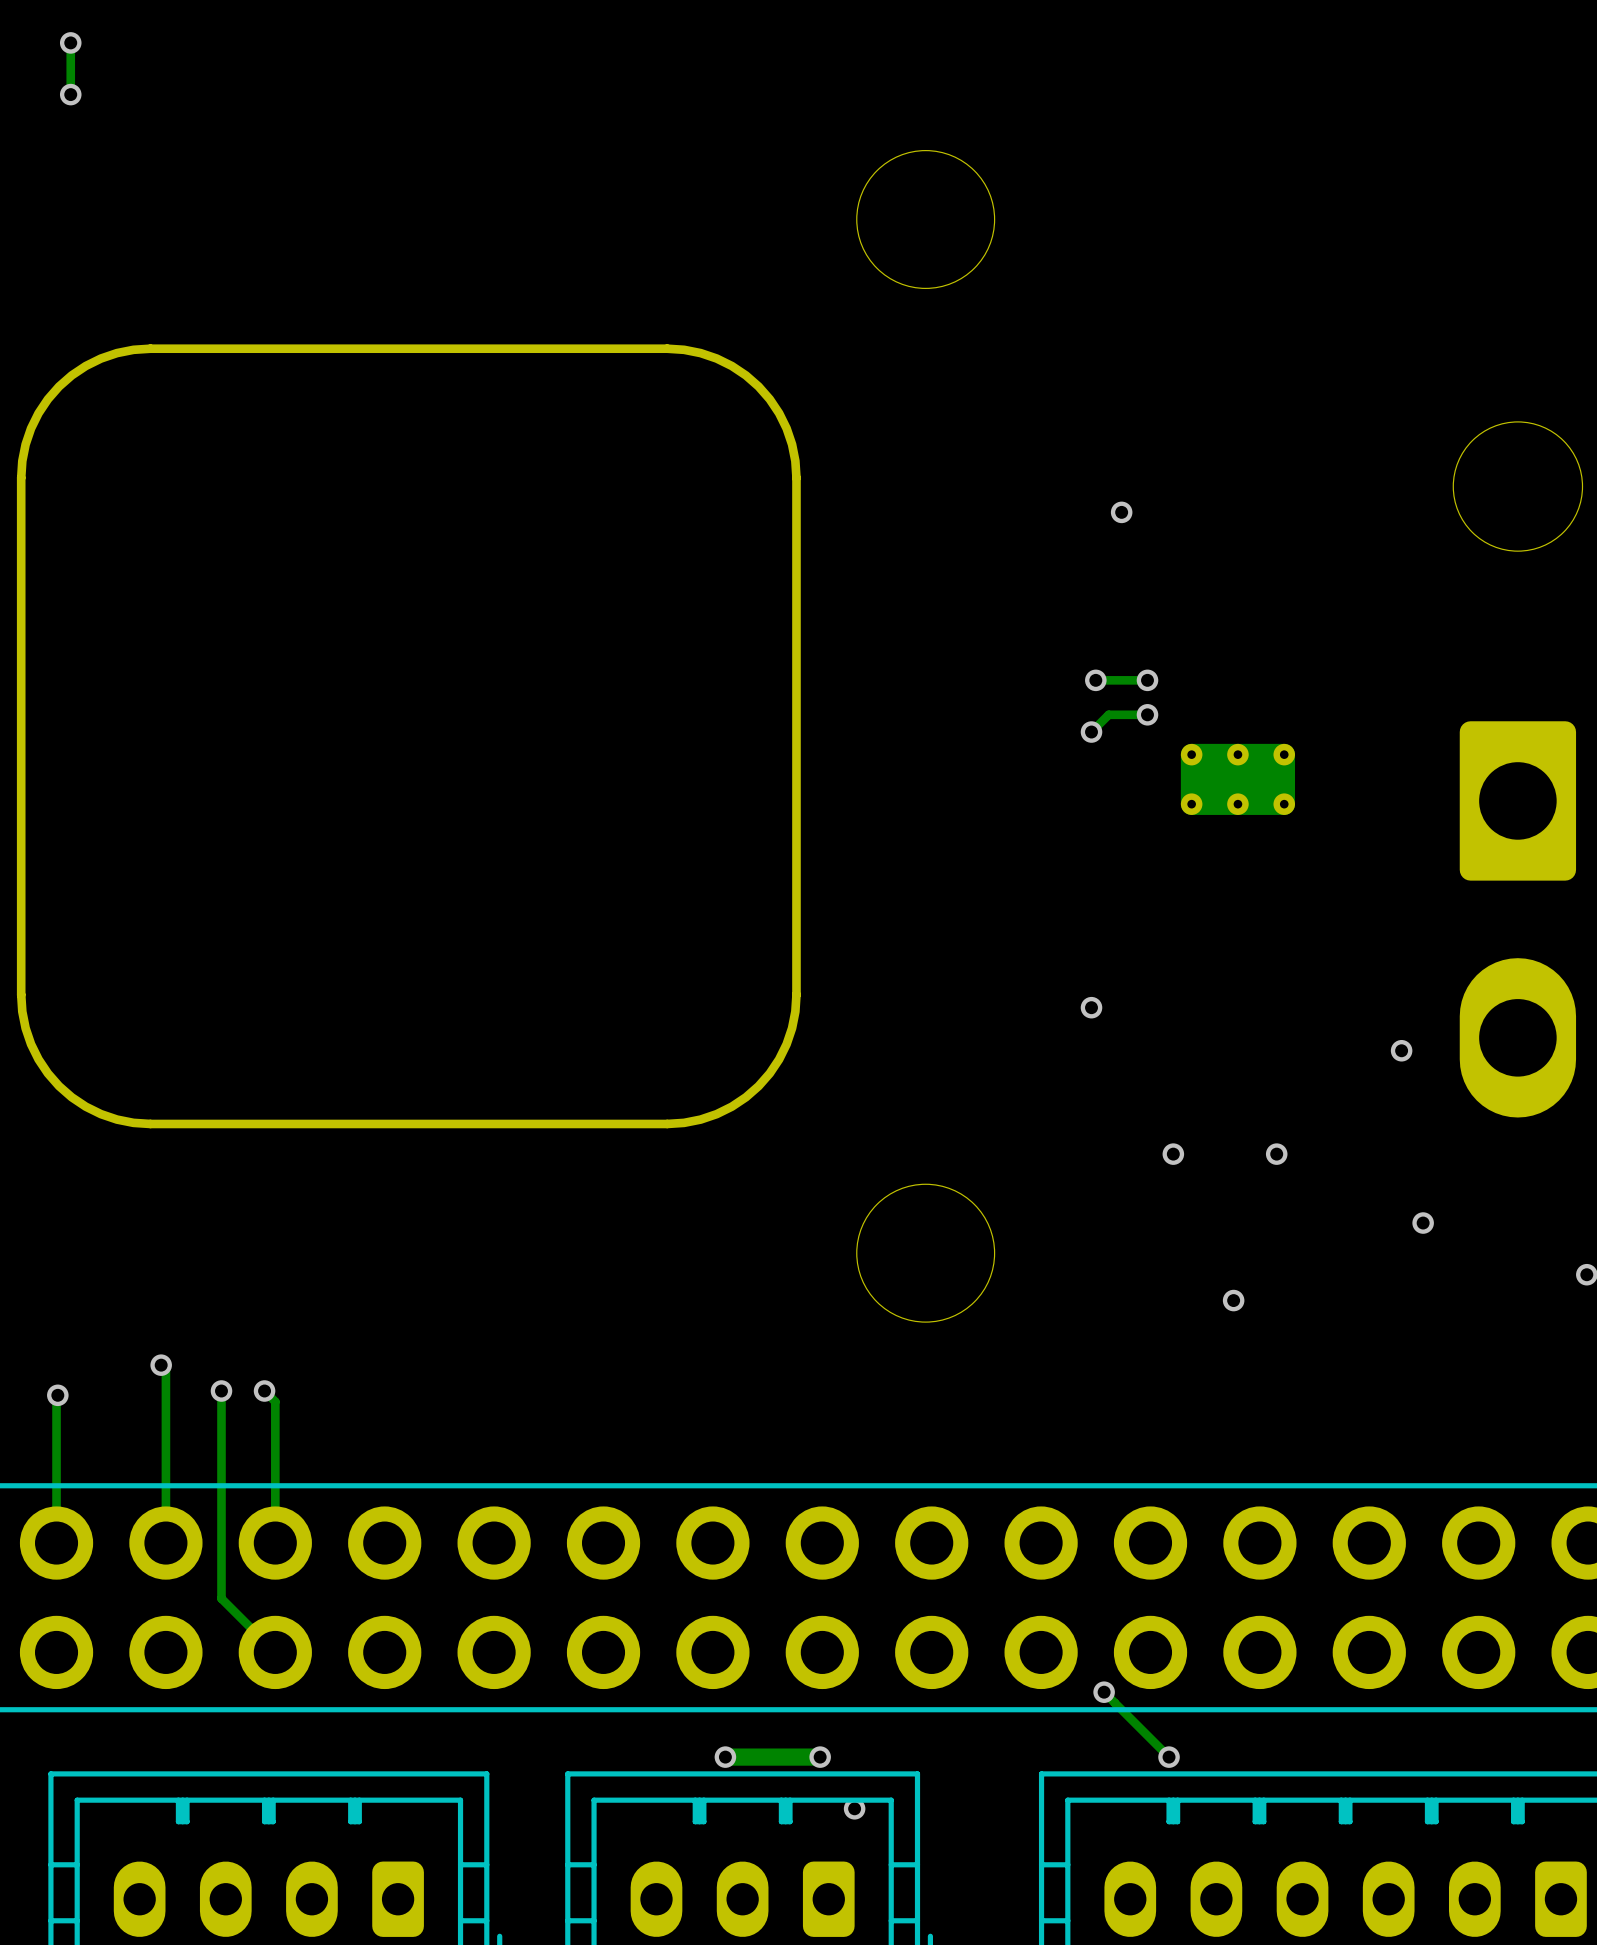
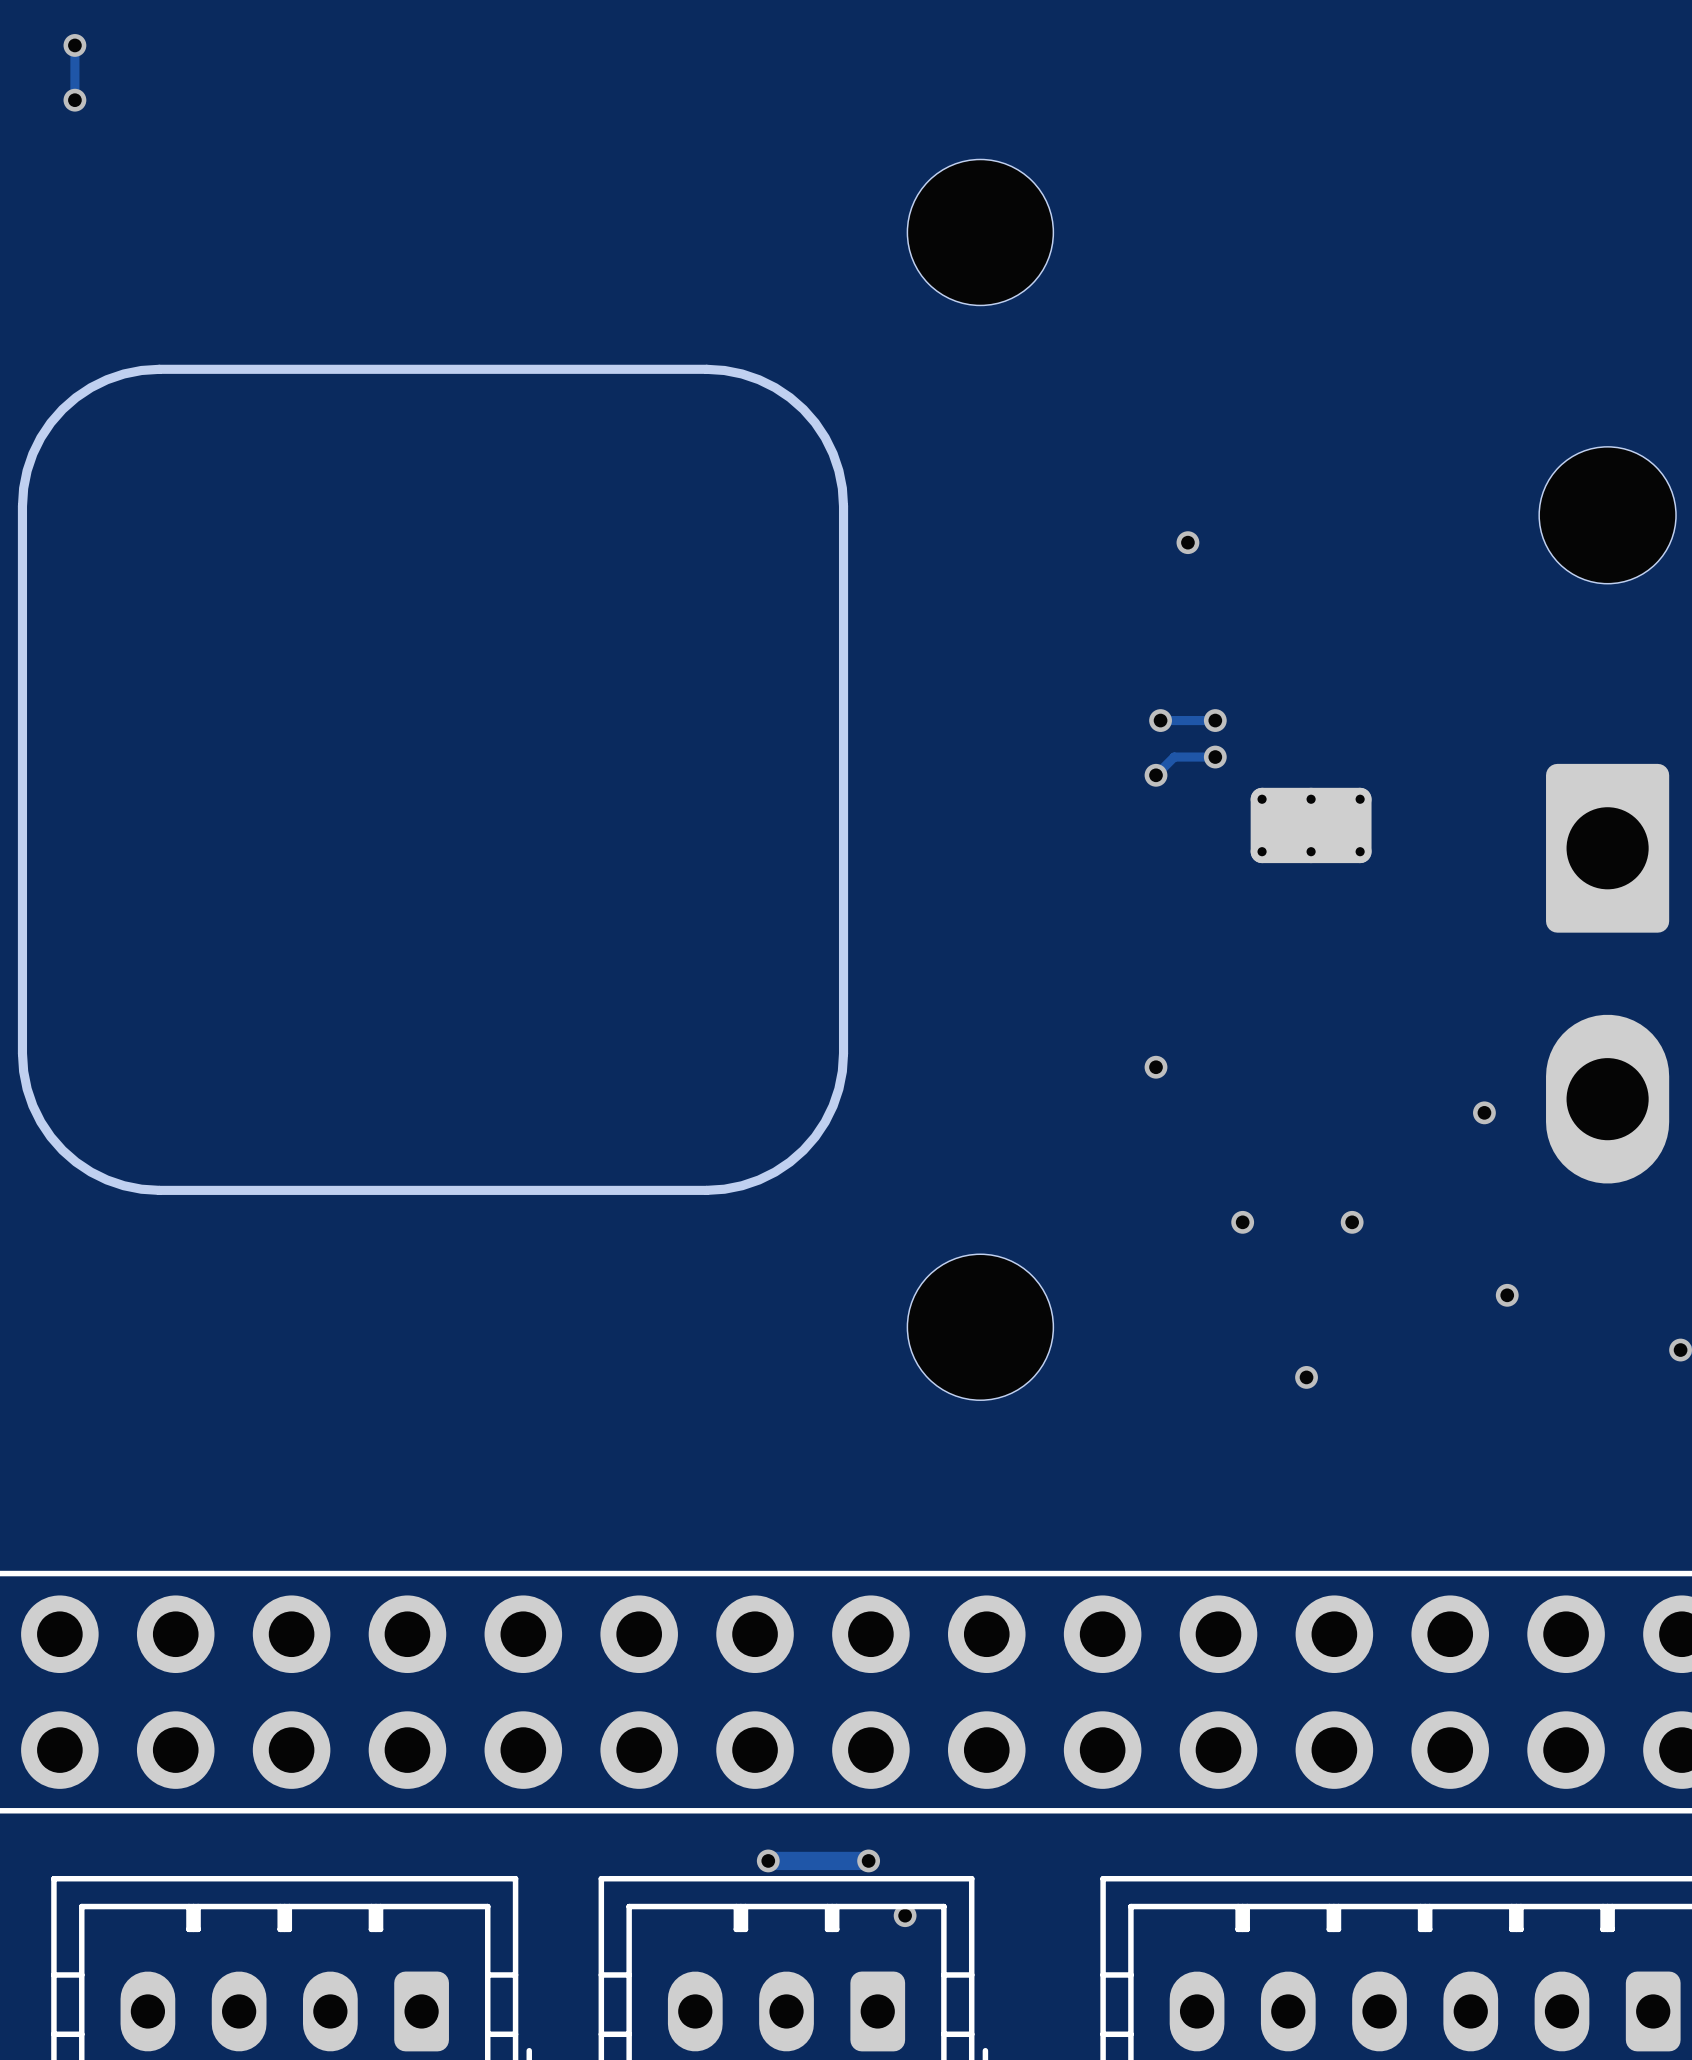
track: (161, 1365) (165, 1369) (165, 1543) -> none
via: (161, 1365) -> none
track: (221, 1391) (221, 1598) (275, 1652) -> none
via: (221, 1391) -> none
track: (264, 1391) (275, 1401) (275, 1543) -> none
via: (264, 1391) -> none
track: (57, 1395) (56, 1543) -> none
via: (57, 1395) -> none
track: (1104, 1692) (1169, 1757) -> none
via: (1104, 1692) -> none
via: (1169, 1757) -> none

